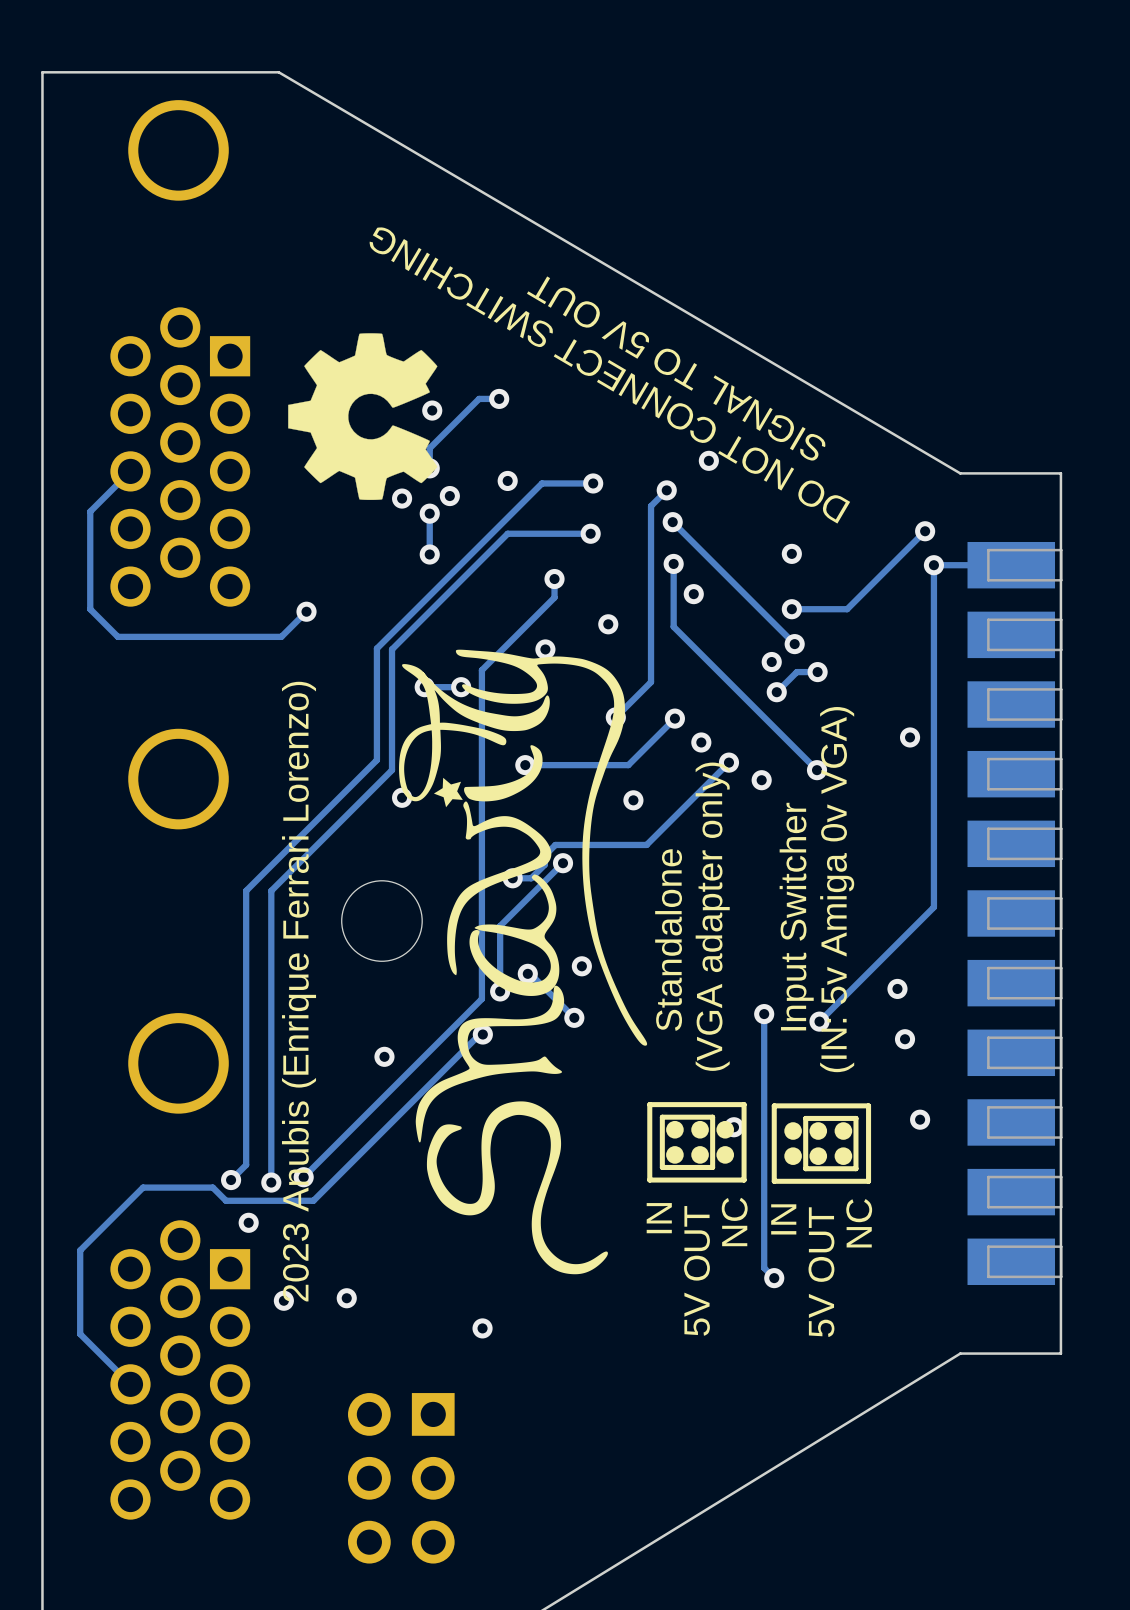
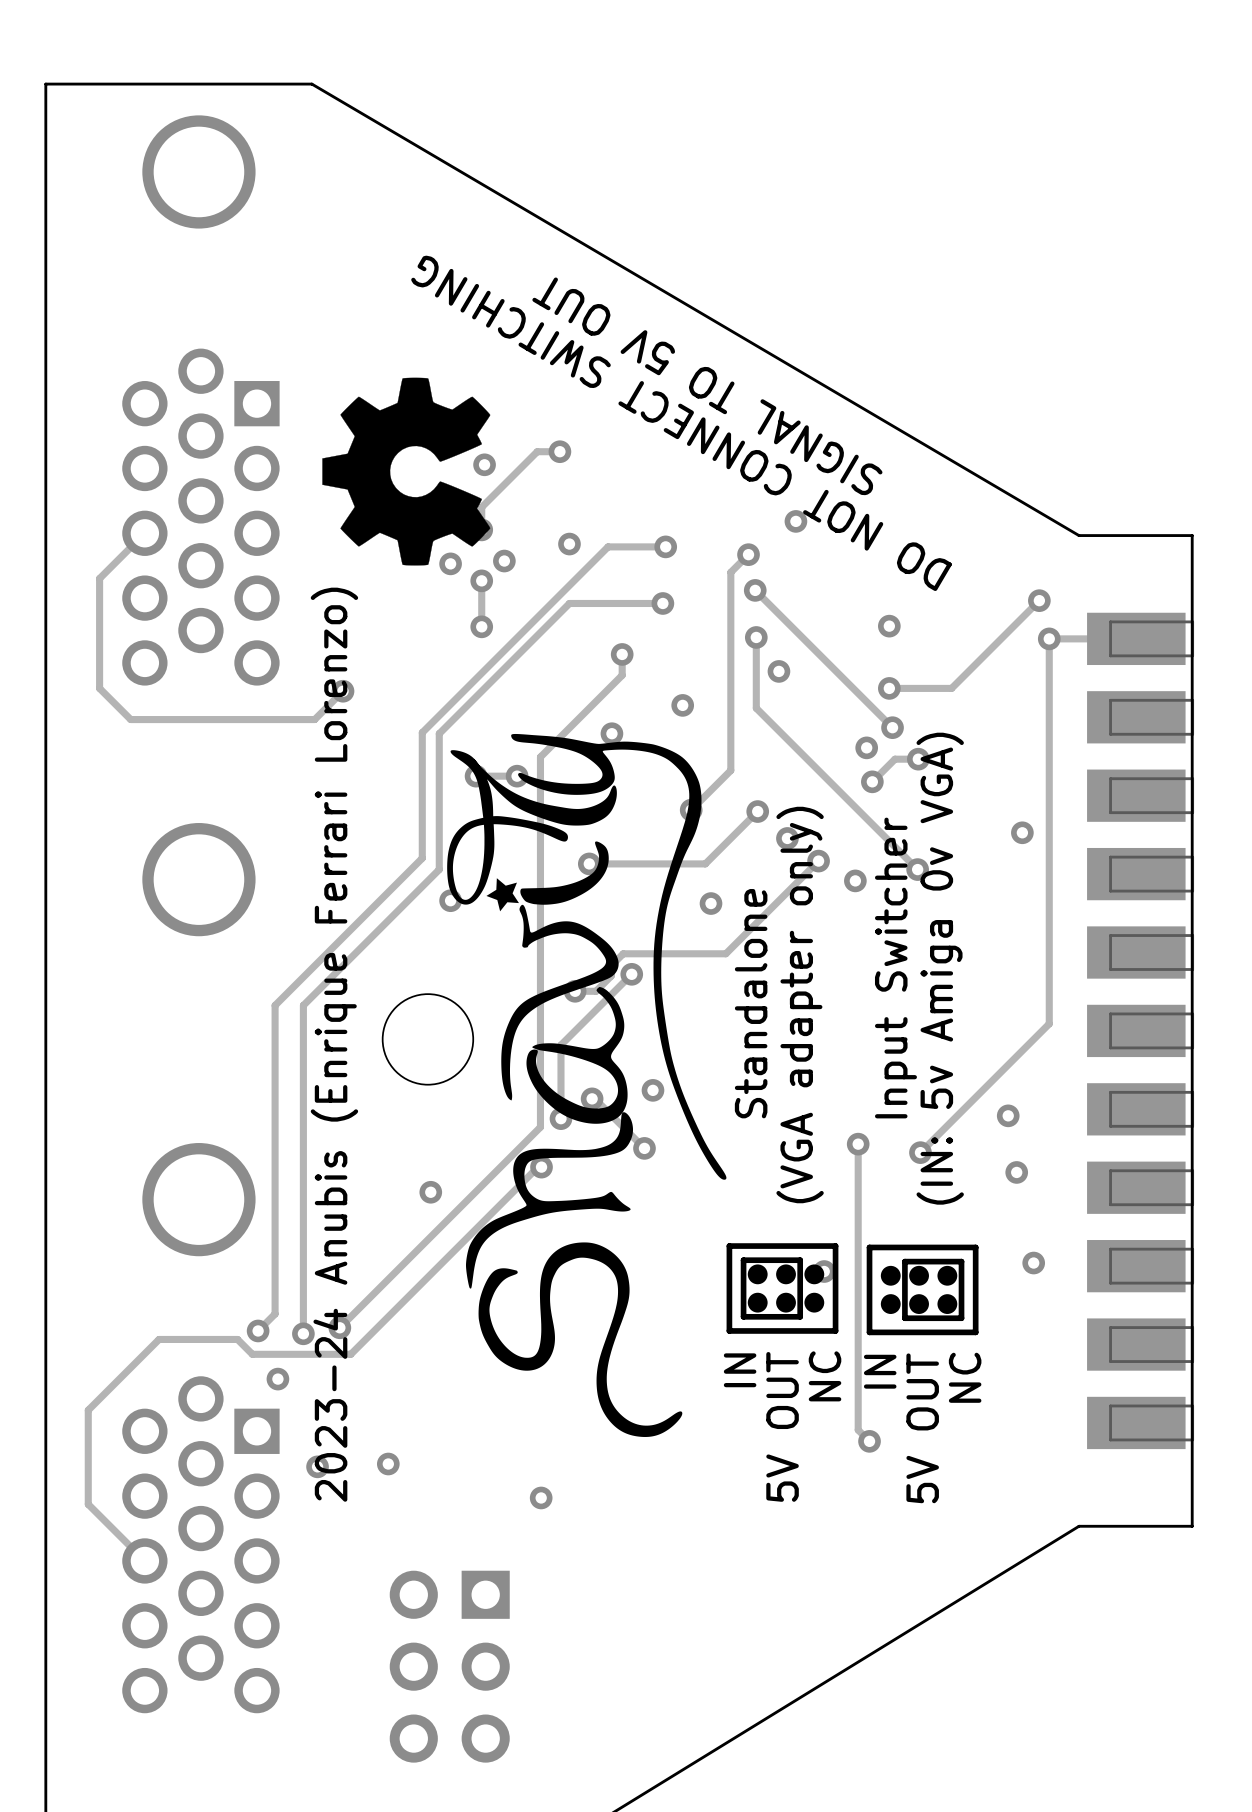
text: 2023 Anubis (Enrique Ferrari Lorenzo) (299, 991) -> 2023-24 Anubis (Enrique Ferrari Lorenzo) (334, 1044)

